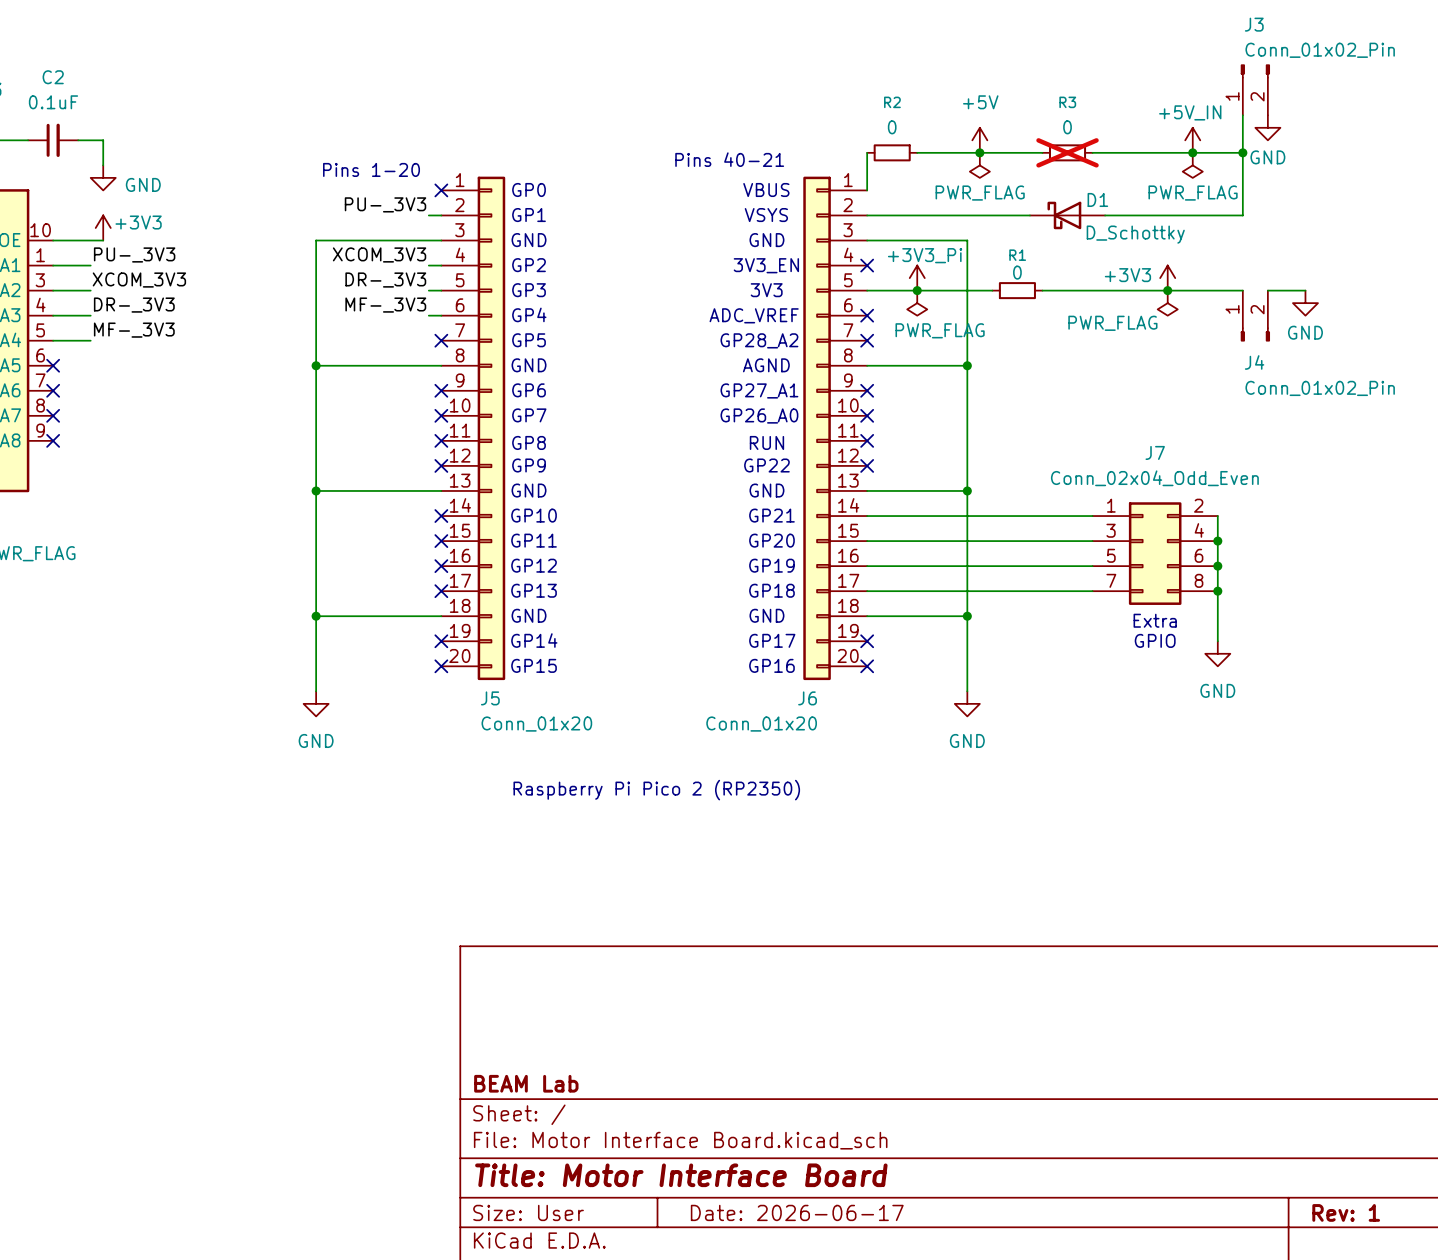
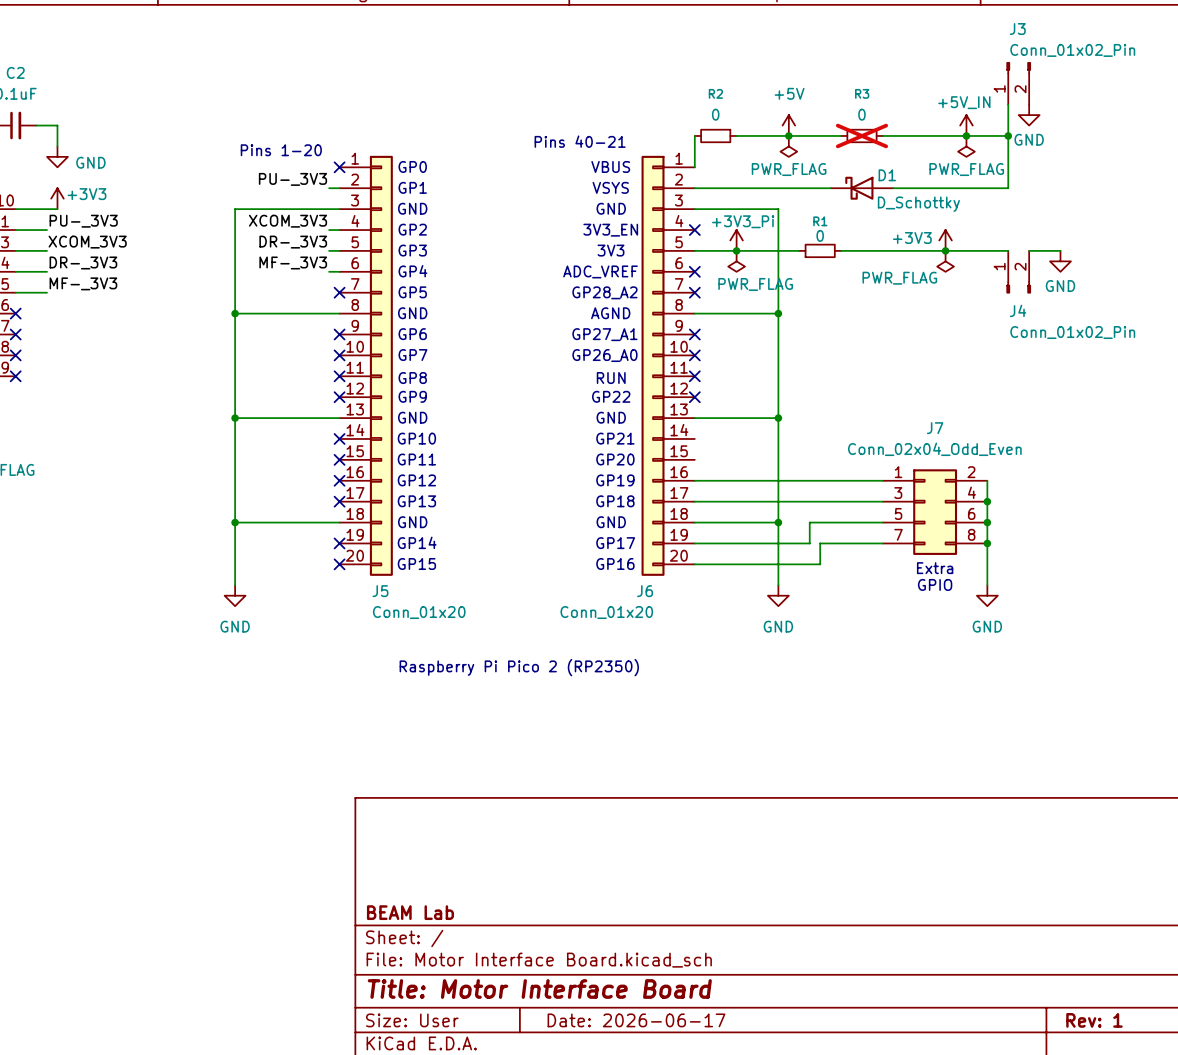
wire: (867, 516) (1092, 516) -> none
wire: (1217, 516) (1217, 566) -> (987, 543) (987, 585)
wire: (867, 541) (1092, 541) -> none
junction: (1217, 541) -> none
J7 position: (1155, 553) -> (935, 512)
junction: (1217, 566) -> none
wire: none -> (882, 522) (809, 522) (809, 543) (694, 543)
junction: none -> (987, 522)
text position: Extra (1155, 620) -> Extra (935, 568)
text position: GPIO (1155, 640) -> GPIO (935, 584)
no-connect mark: (867, 641) -> none
wire: none -> (882, 543) (820, 543) (820, 564) (694, 564)
junction: none -> (987, 543)
power symbol position: GND (1217, 653) -> GND (987, 595)
no-connect mark: (867, 666) -> none

